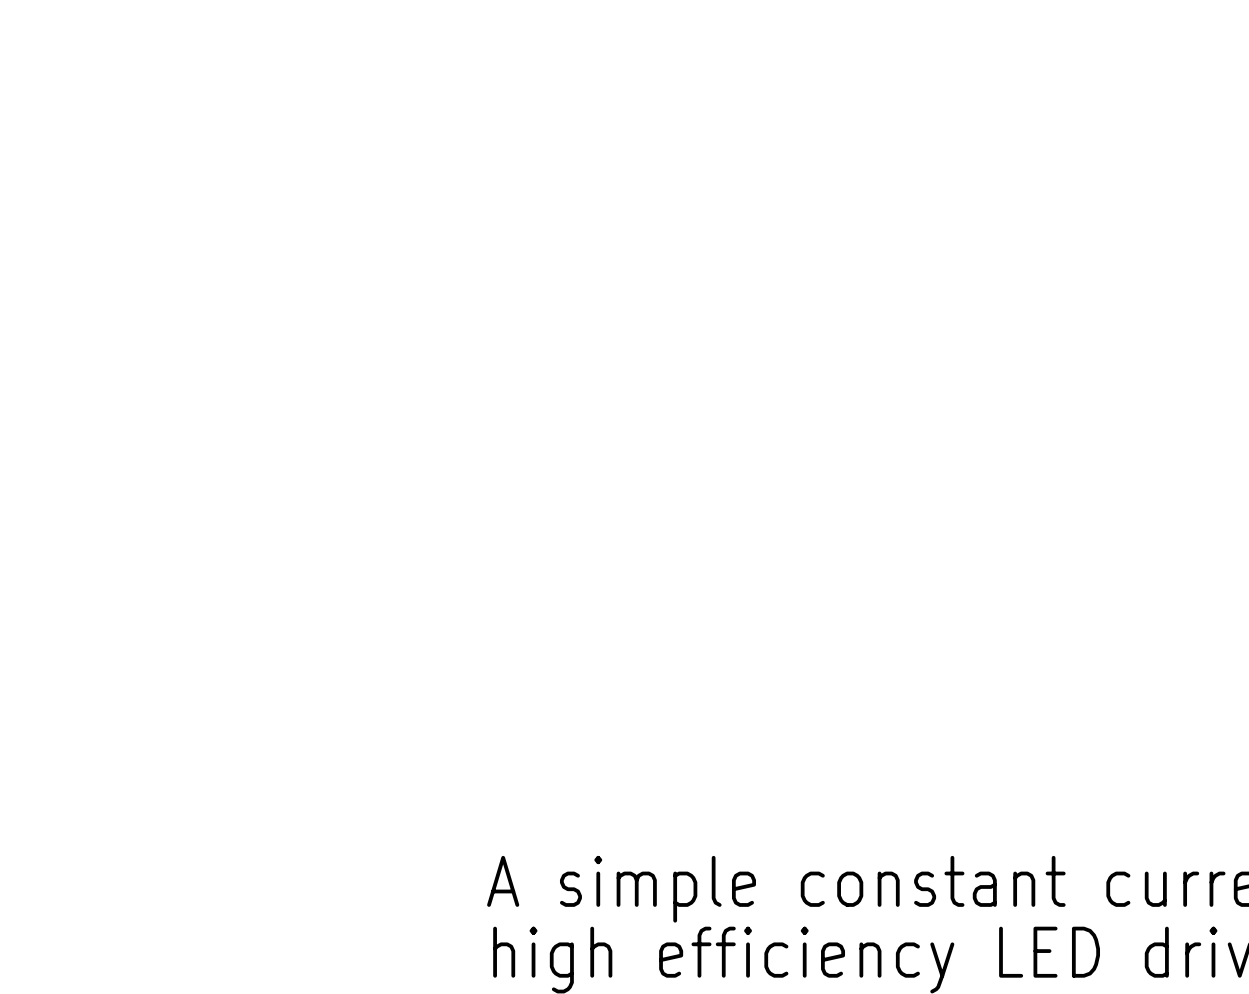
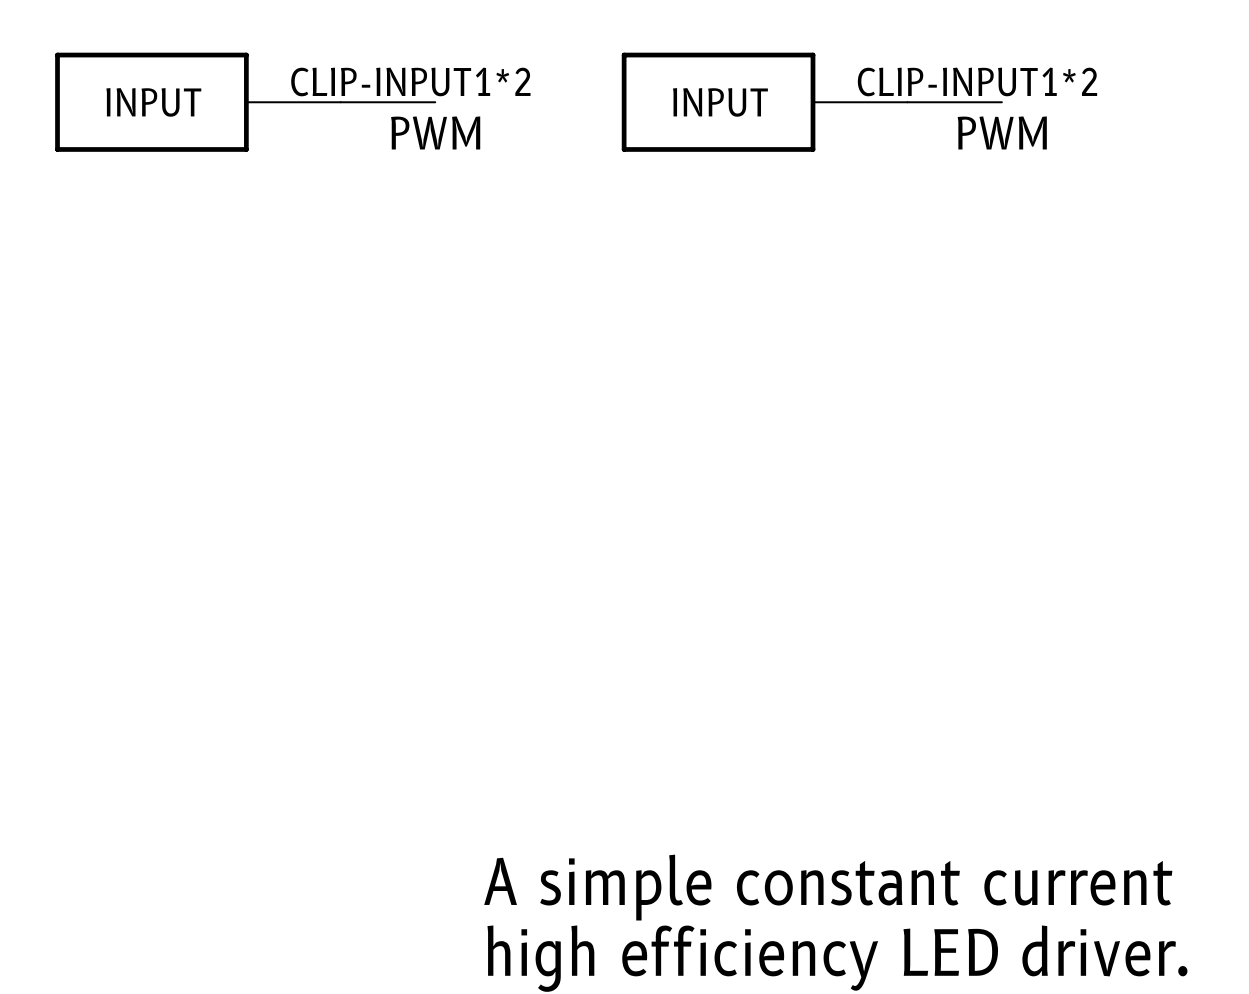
part: none -> (197, 102)
wire: none -> (340, 102) (435, 102)
part: none -> (764, 102)
wire: none -> (907, 102) (1001, 102)
label: none -> PWM (435, 132)
label: none -> PWM (1002, 132)

